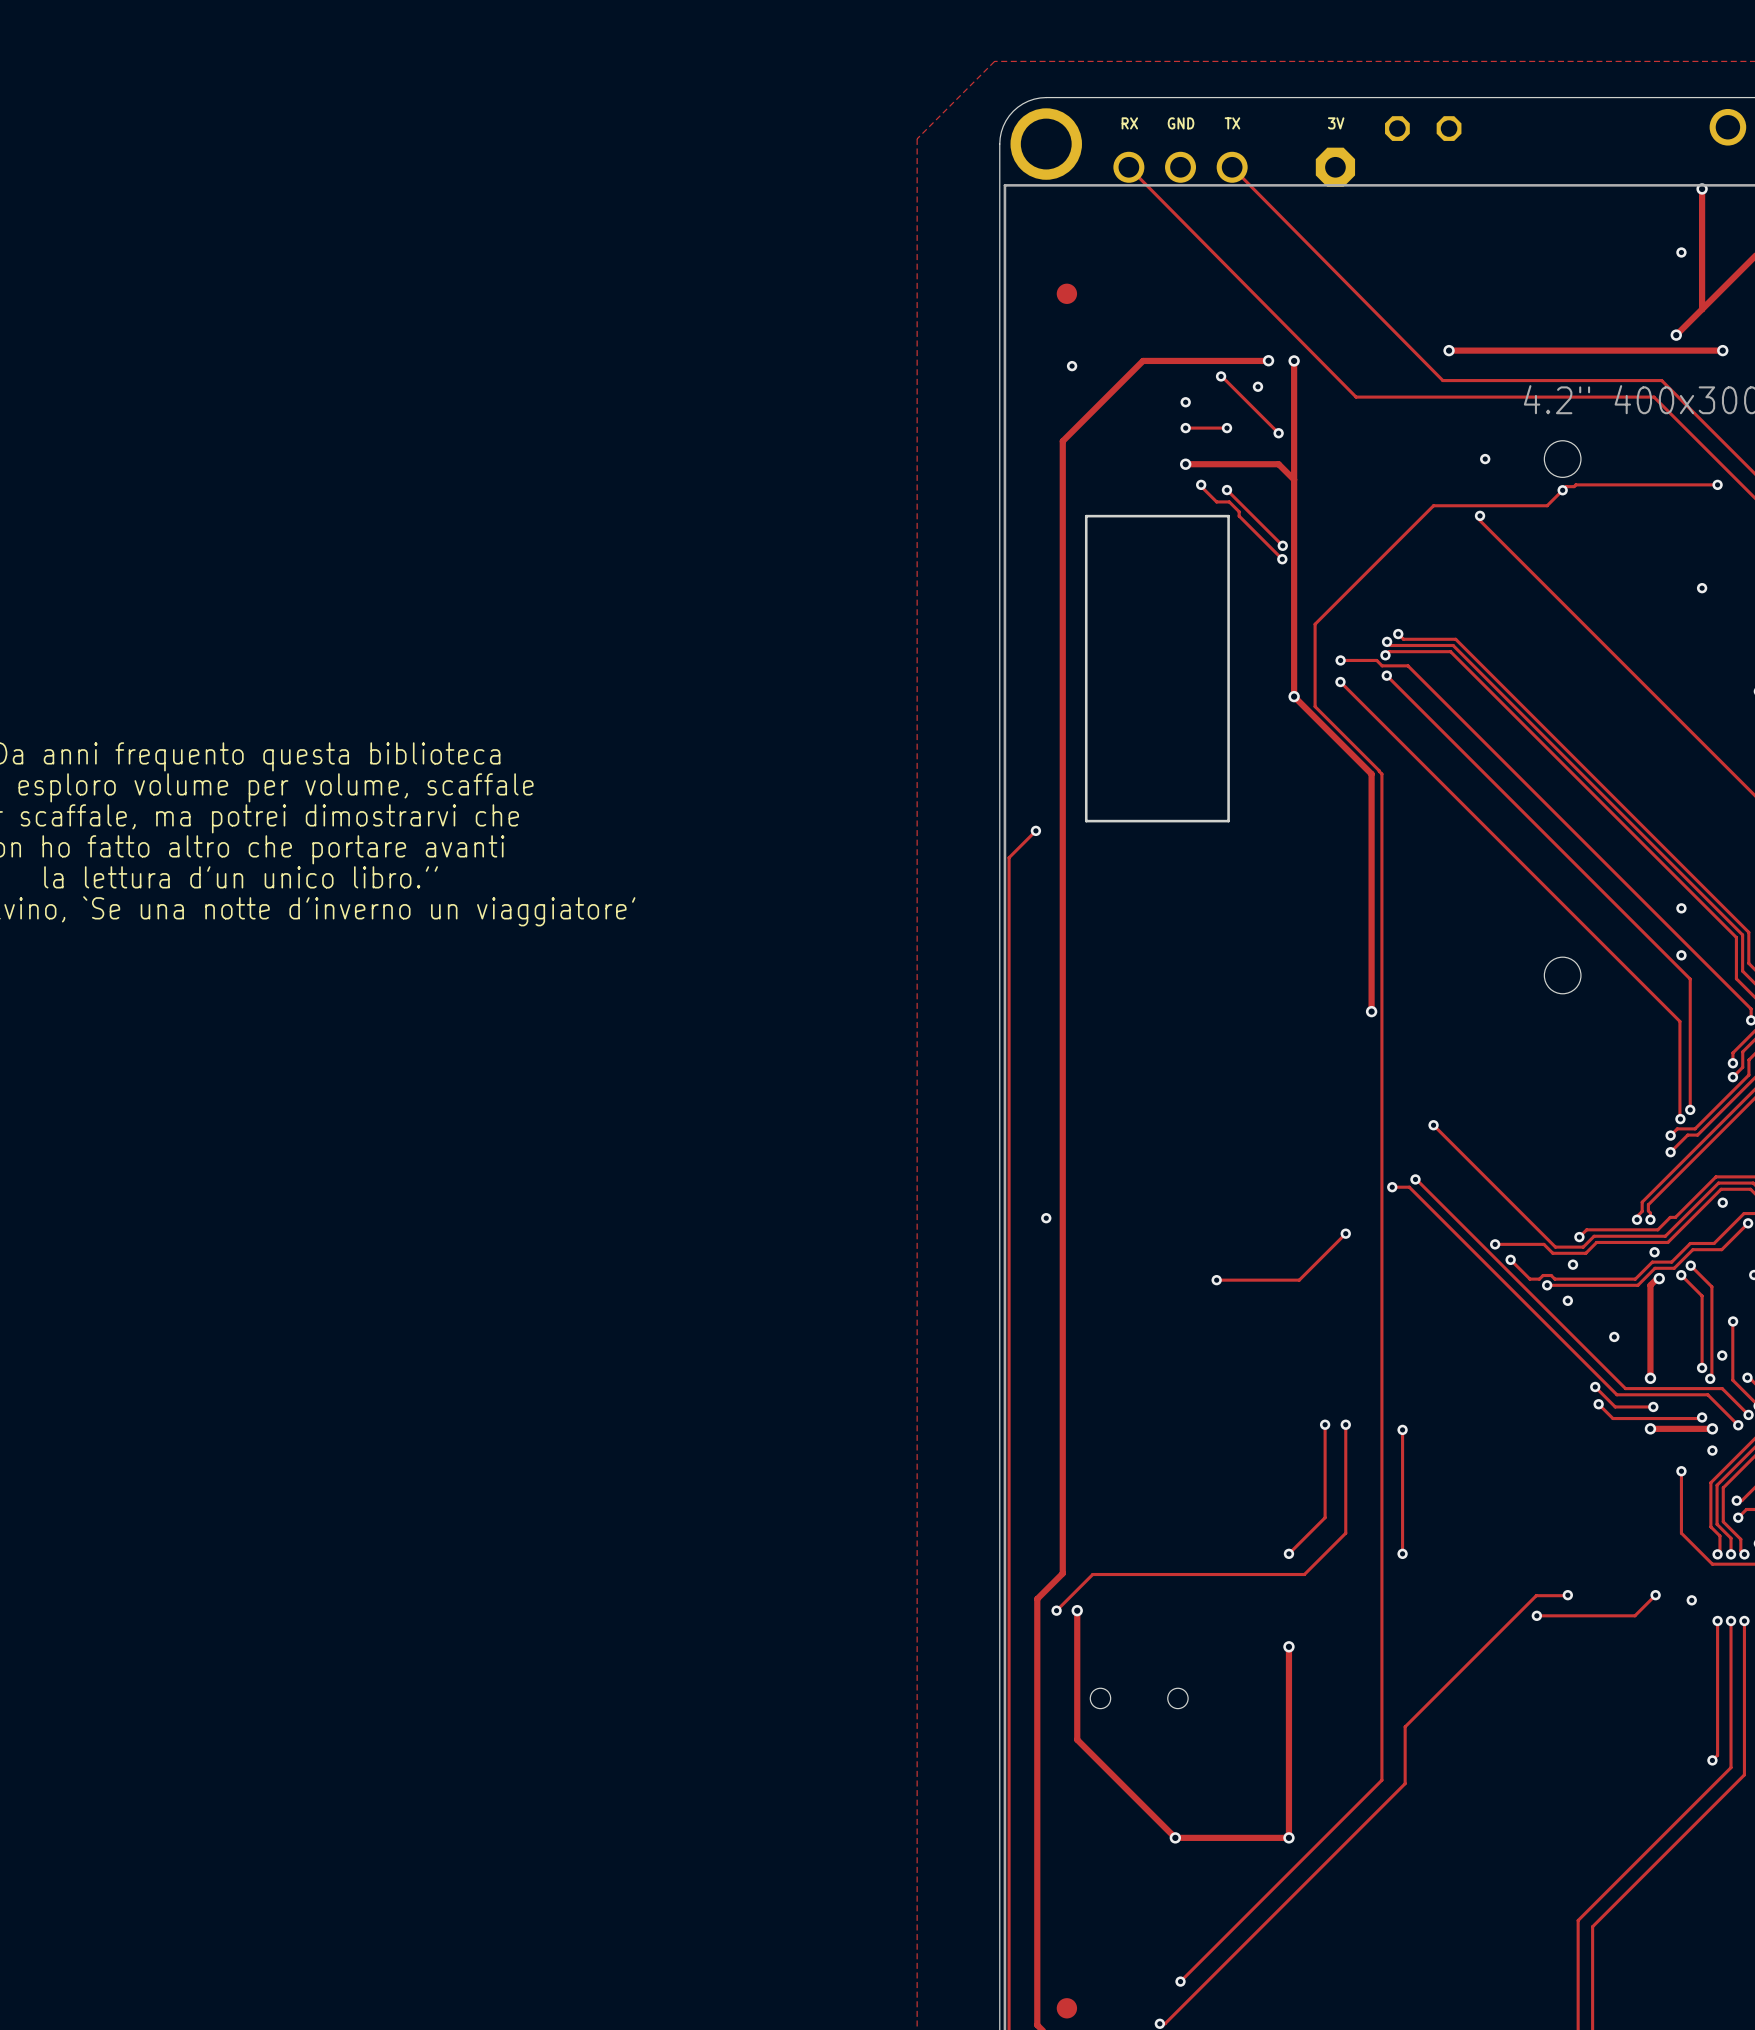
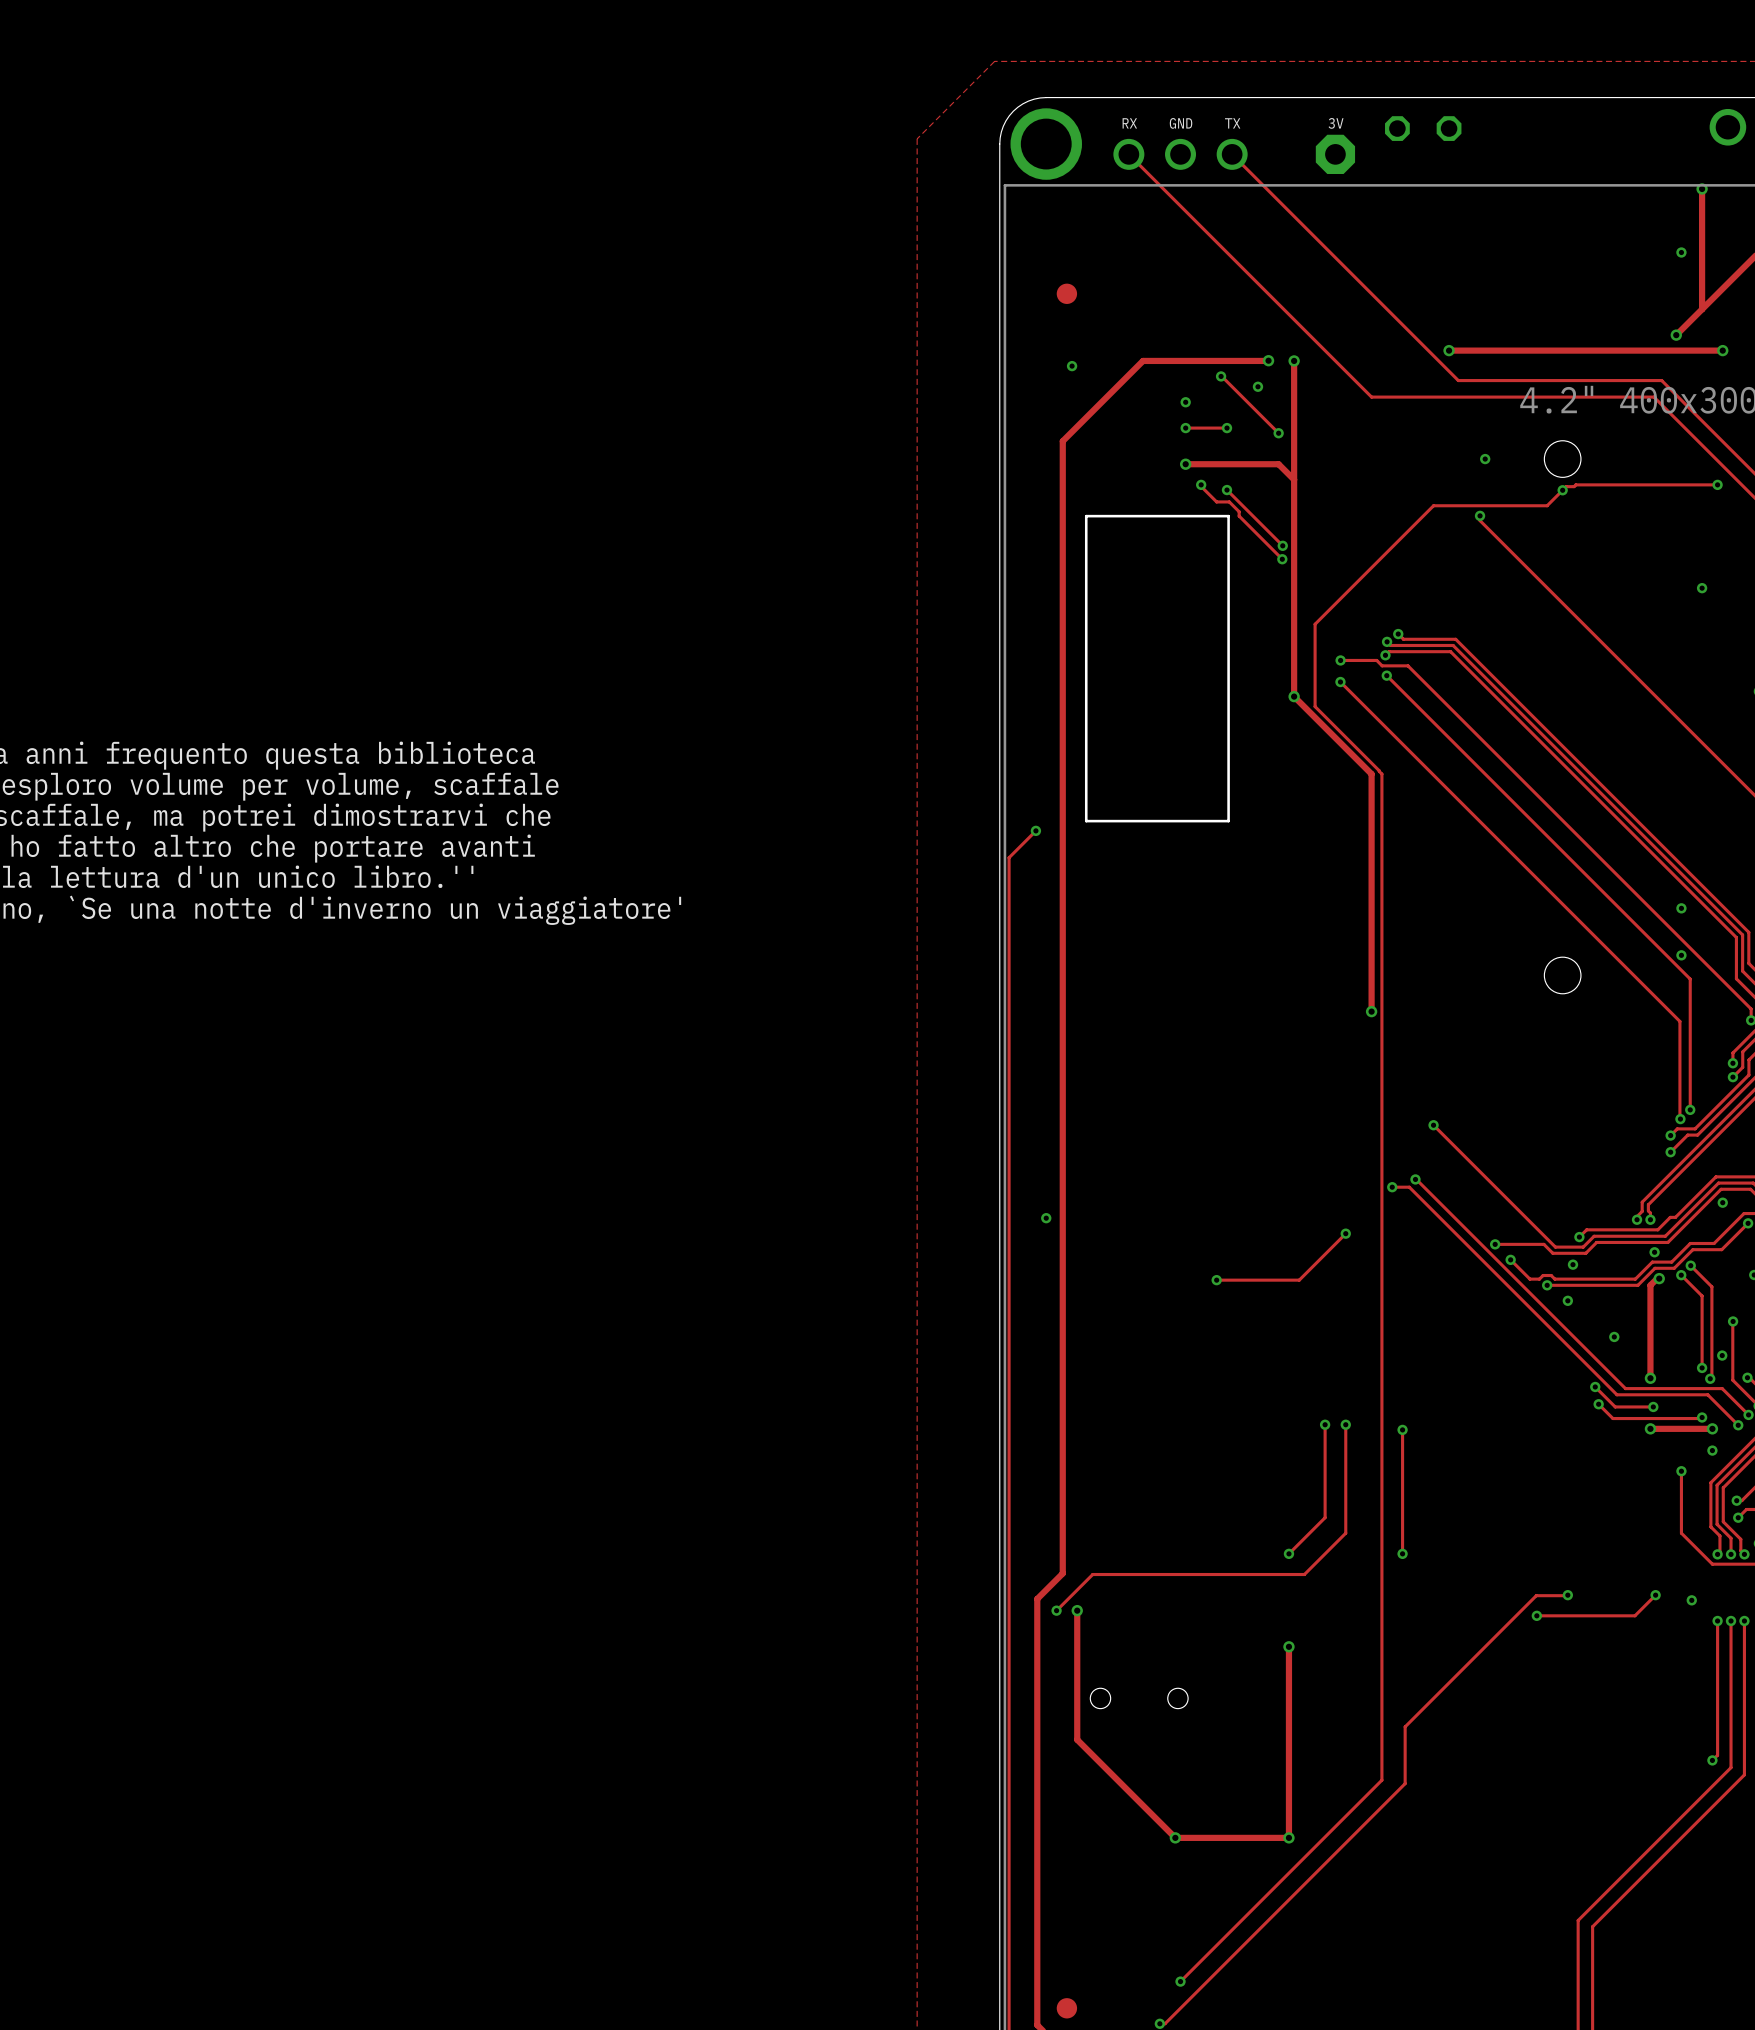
track: (1128, 167) (1356, 397) (1371, 397) -> (1128, 154) (1371, 397)
part position: (1180, 167) -> (1180, 154)
track: (1232, 167) (1442, 380) (1458, 380) -> (1232, 154) (1458, 380)
part position: (1335, 167) -> (1335, 154)

